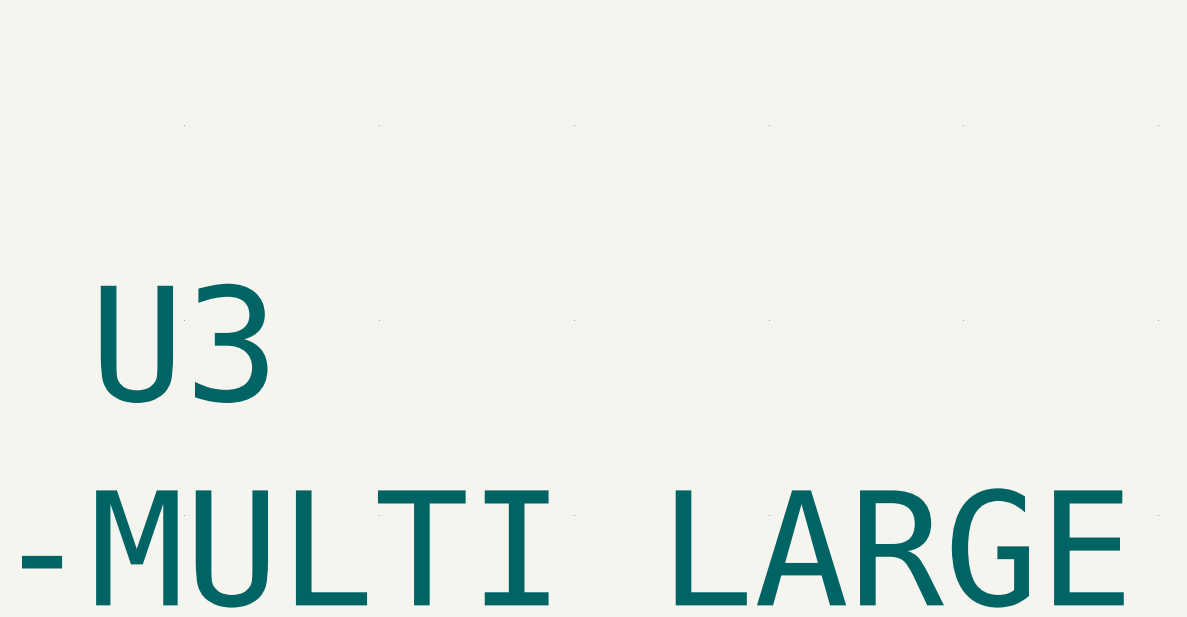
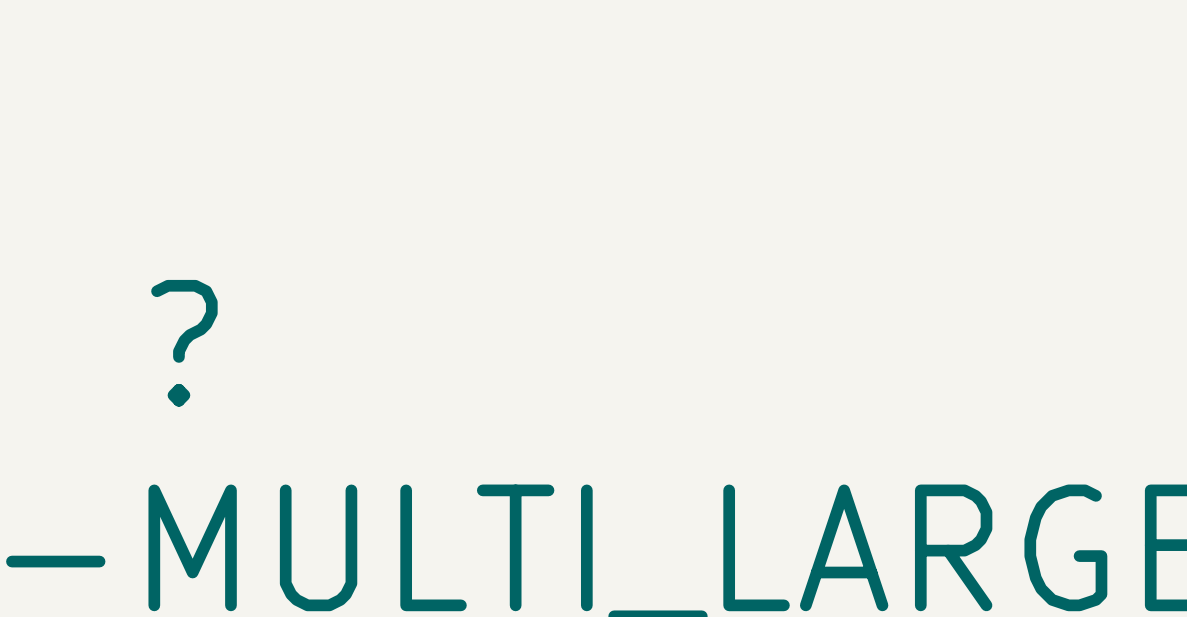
U3 name: U3 (184, 343) -> ? (184, 343)

